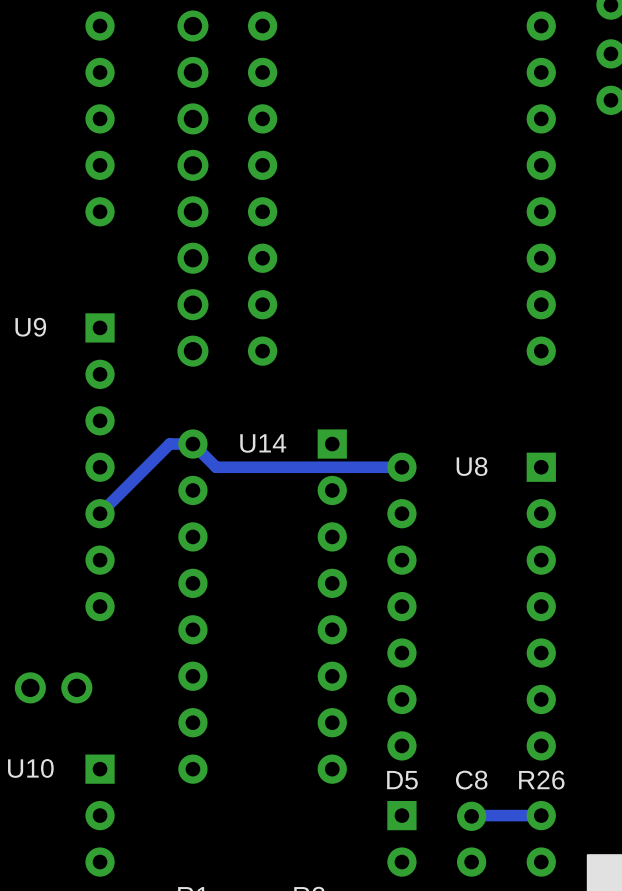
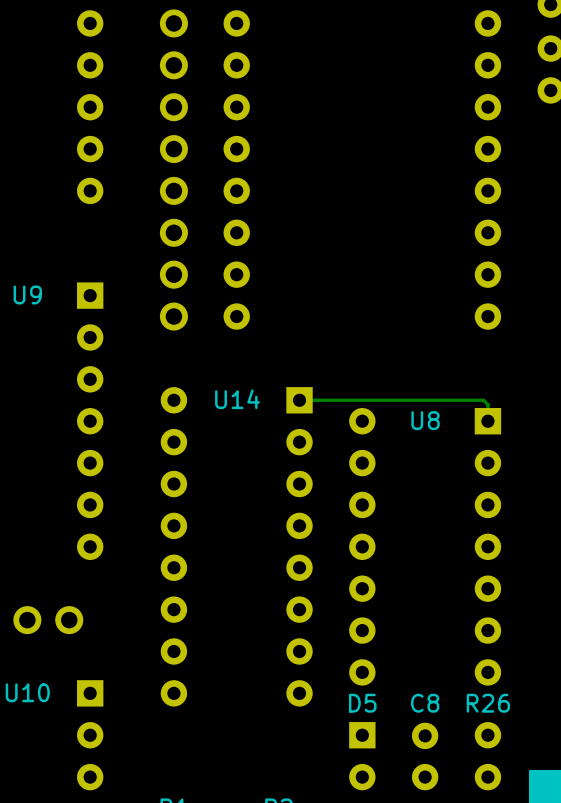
track: none -> (299, 400) (483, 400) (487, 404) (487, 421)
track: (401, 467) (216, 467) (192, 444) (169, 444) (100, 513) -> none
track: (541, 815) (471, 816) -> none

